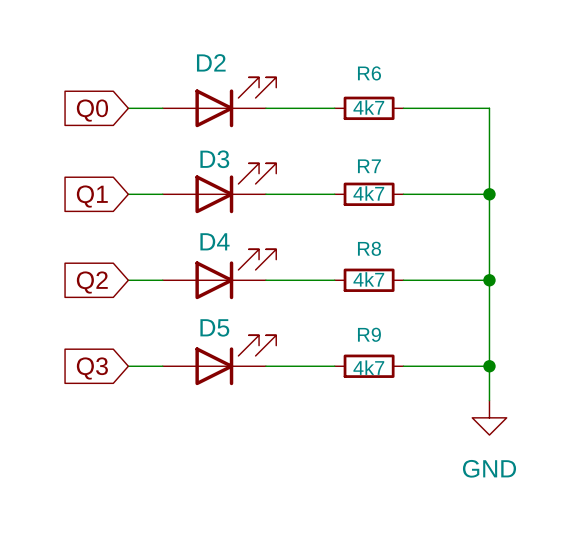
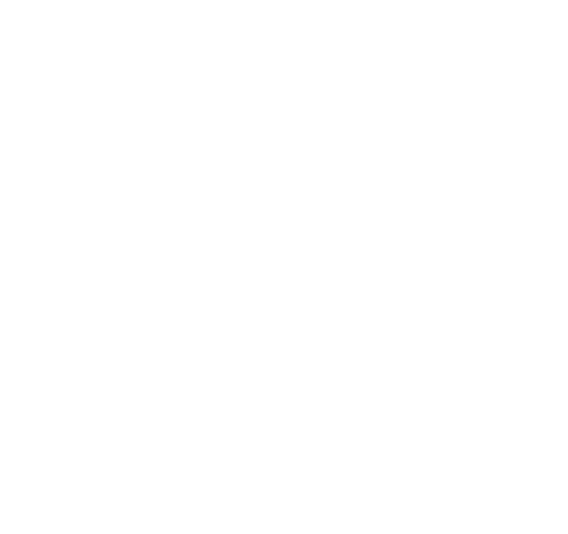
D2: (219, 102) -> none
wire: (128, 108) (162, 108) -> none
wire: (265, 108) (334, 108) -> none
R6: 4k7 (369, 108) -> none
wire: (403, 108) (489, 108) (489, 400) -> none
global label: Q0 (92, 110) -> none
D3: (219, 188) -> none
wire: (128, 194) (162, 194) -> none
wire: (265, 194) (334, 194) -> none
R7: 4k7 (369, 194) -> none
wire: (403, 194) (489, 194) -> none
junction: (489, 194) -> none
global label: Q1 (92, 196) -> none
D4: (219, 274) -> none
wire: (128, 280) (162, 280) -> none
wire: (265, 280) (334, 280) -> none
R8: 4k7 (369, 280) -> none
wire: (403, 280) (489, 280) -> none
junction: (489, 280) -> none
global label: Q2 (92, 282) -> none
D5: (219, 360) -> none
wire: (128, 366) (162, 366) -> none
wire: (265, 366) (334, 366) -> none
R9: 4k7 (369, 366) -> none
wire: (403, 366) (489, 366) -> none
junction: (489, 366) -> none
global label: Q3 (92, 368) -> none
power symbol: GND (489, 417) -> none

